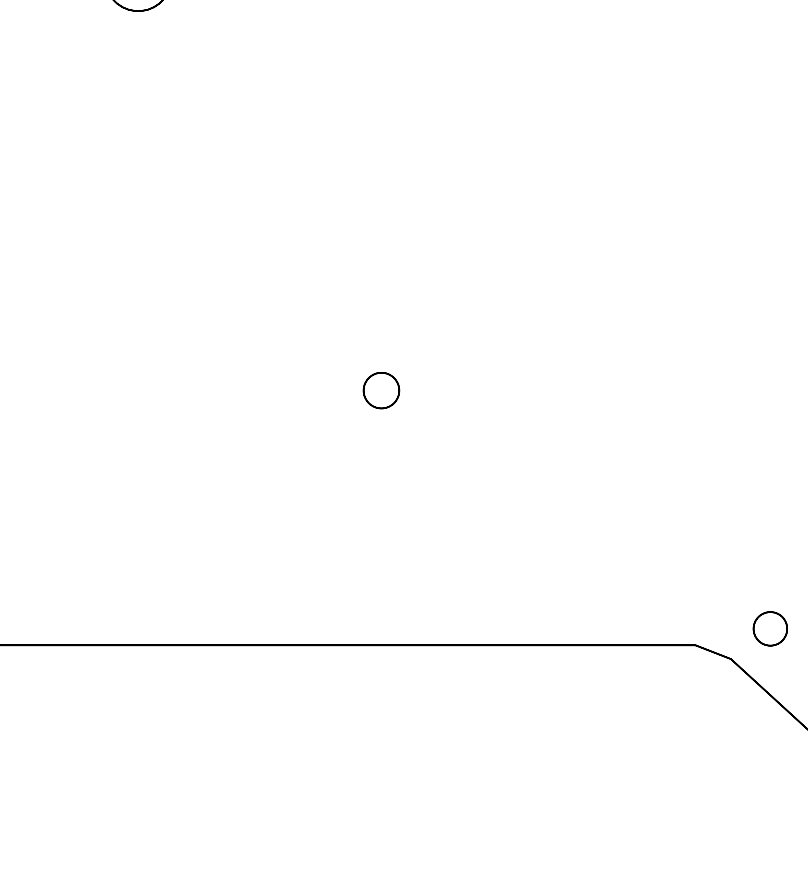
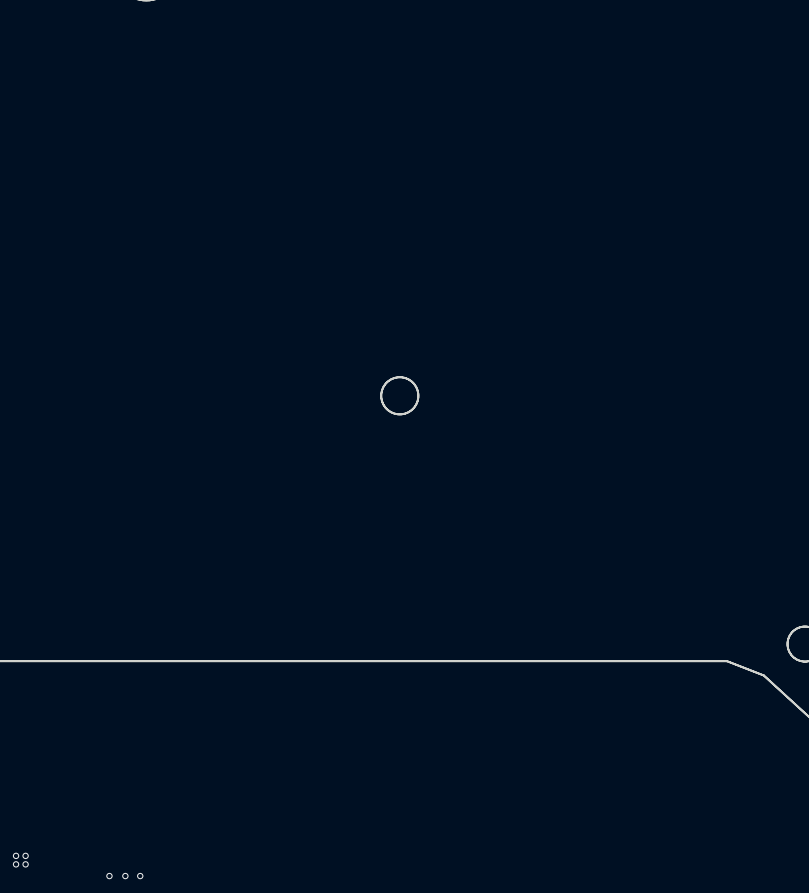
via: none -> (16, 855)
via: none -> (25, 855)
via: none -> (16, 864)
via: none -> (25, 864)
via: none -> (109, 876)
via: none -> (125, 876)
via: none -> (140, 876)

